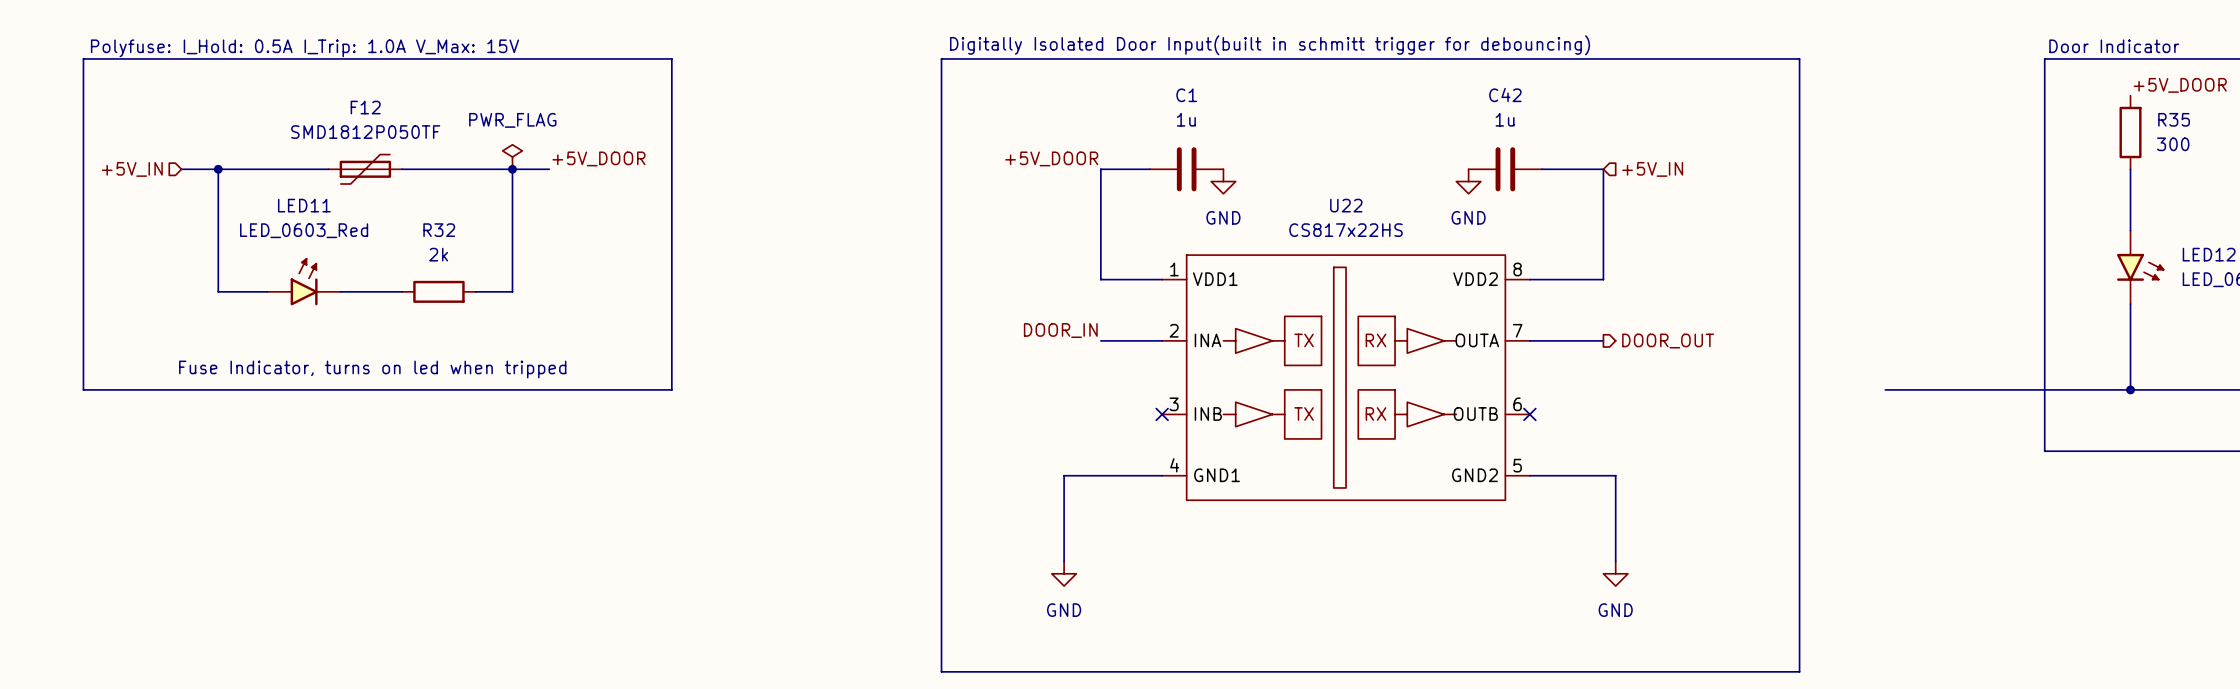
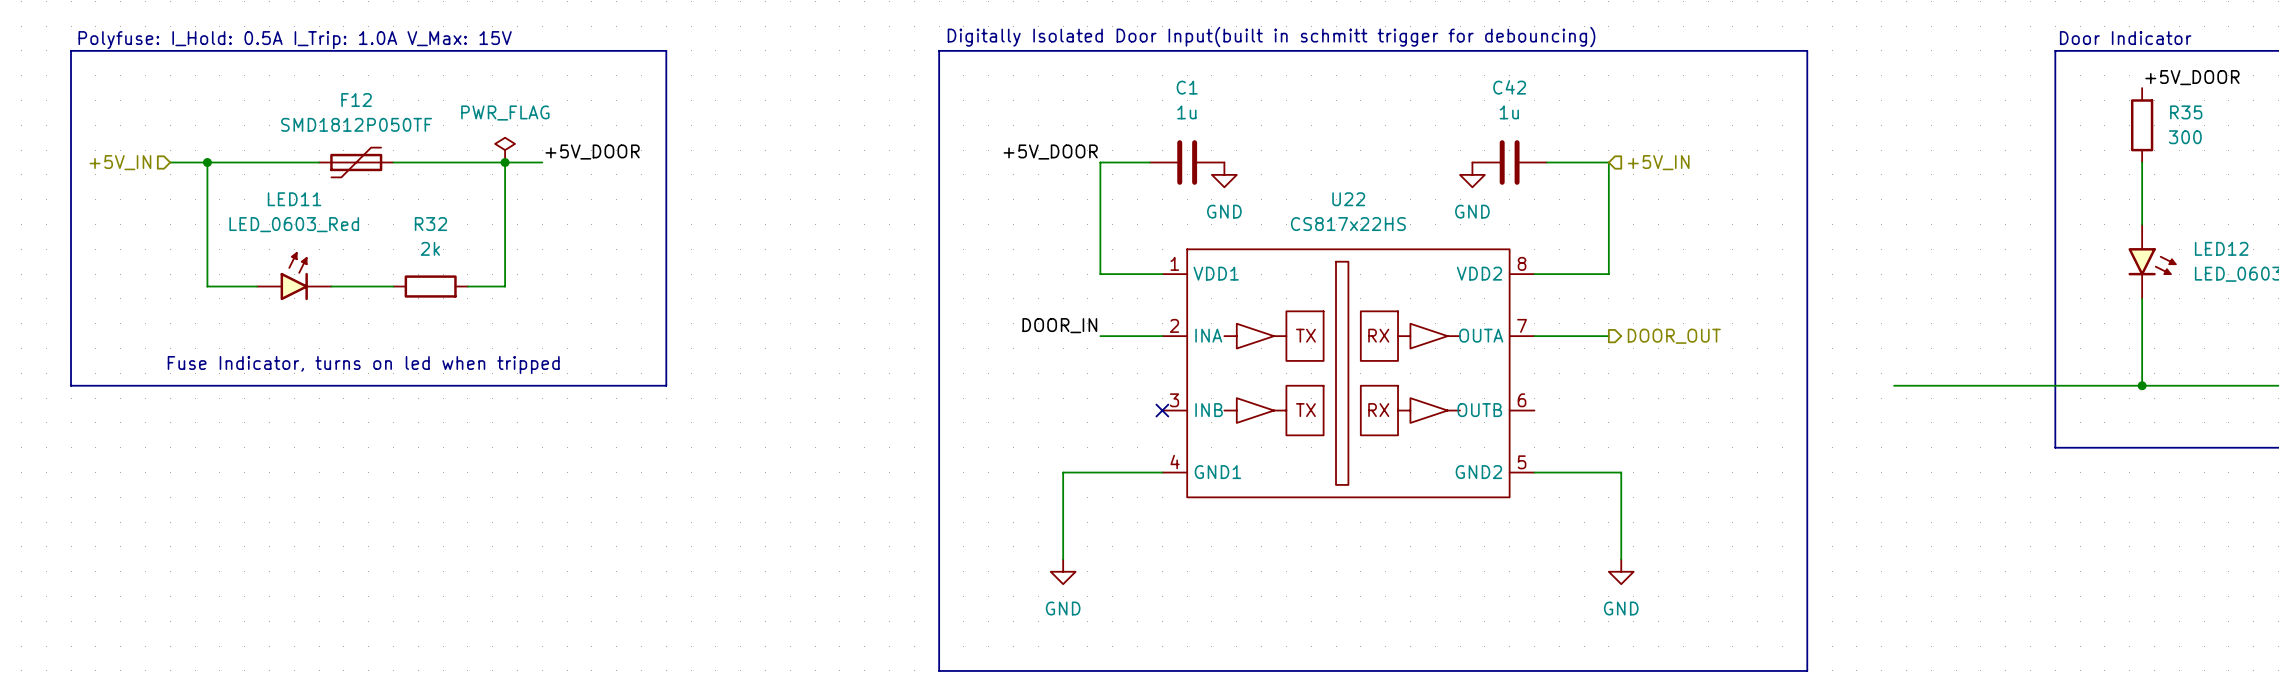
no-connect mark: (1529, 414) -> none

